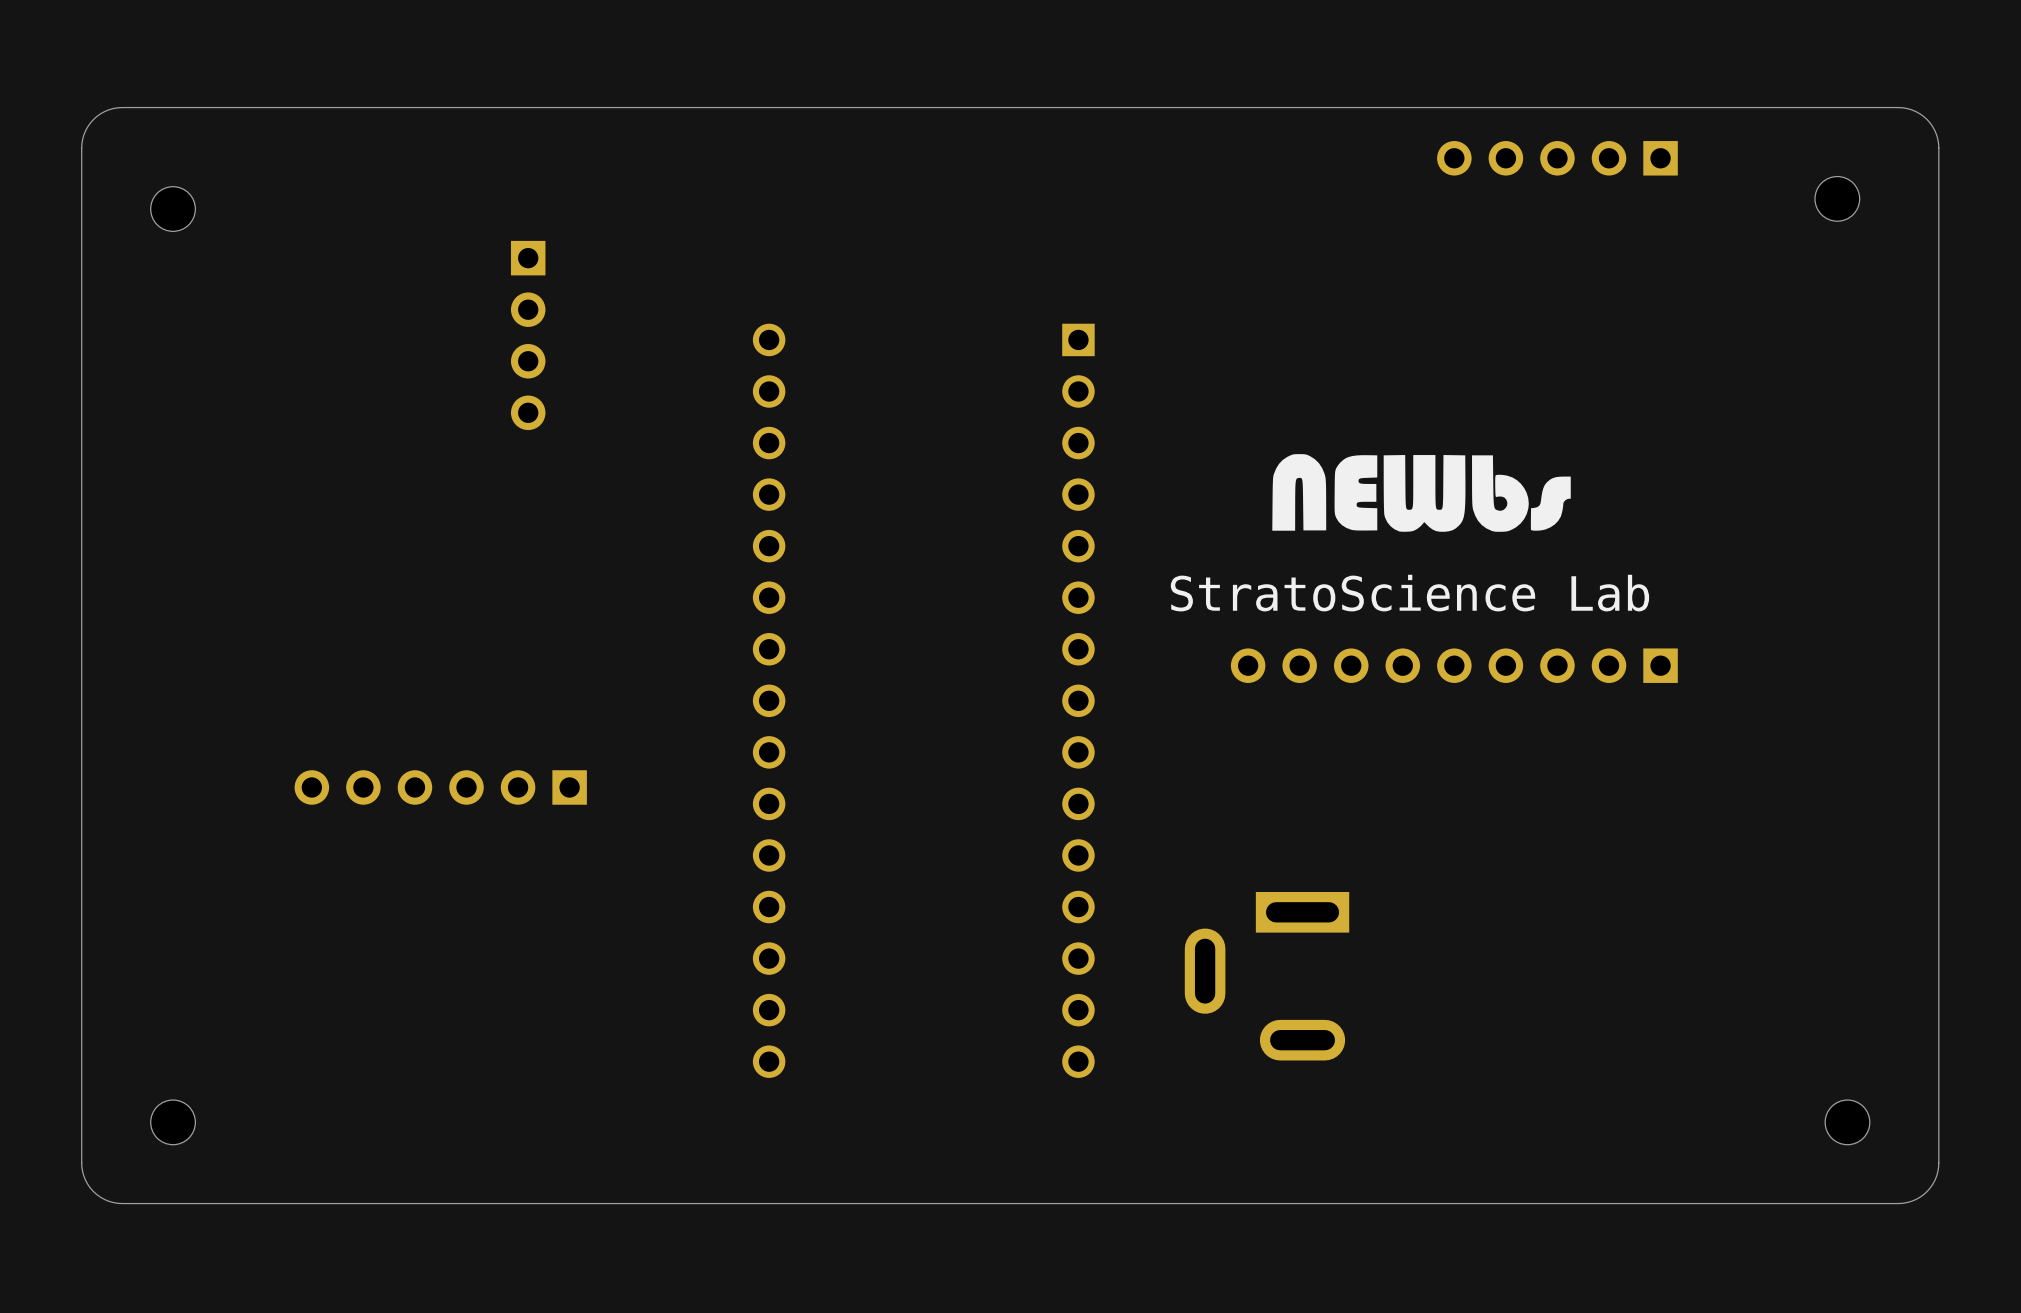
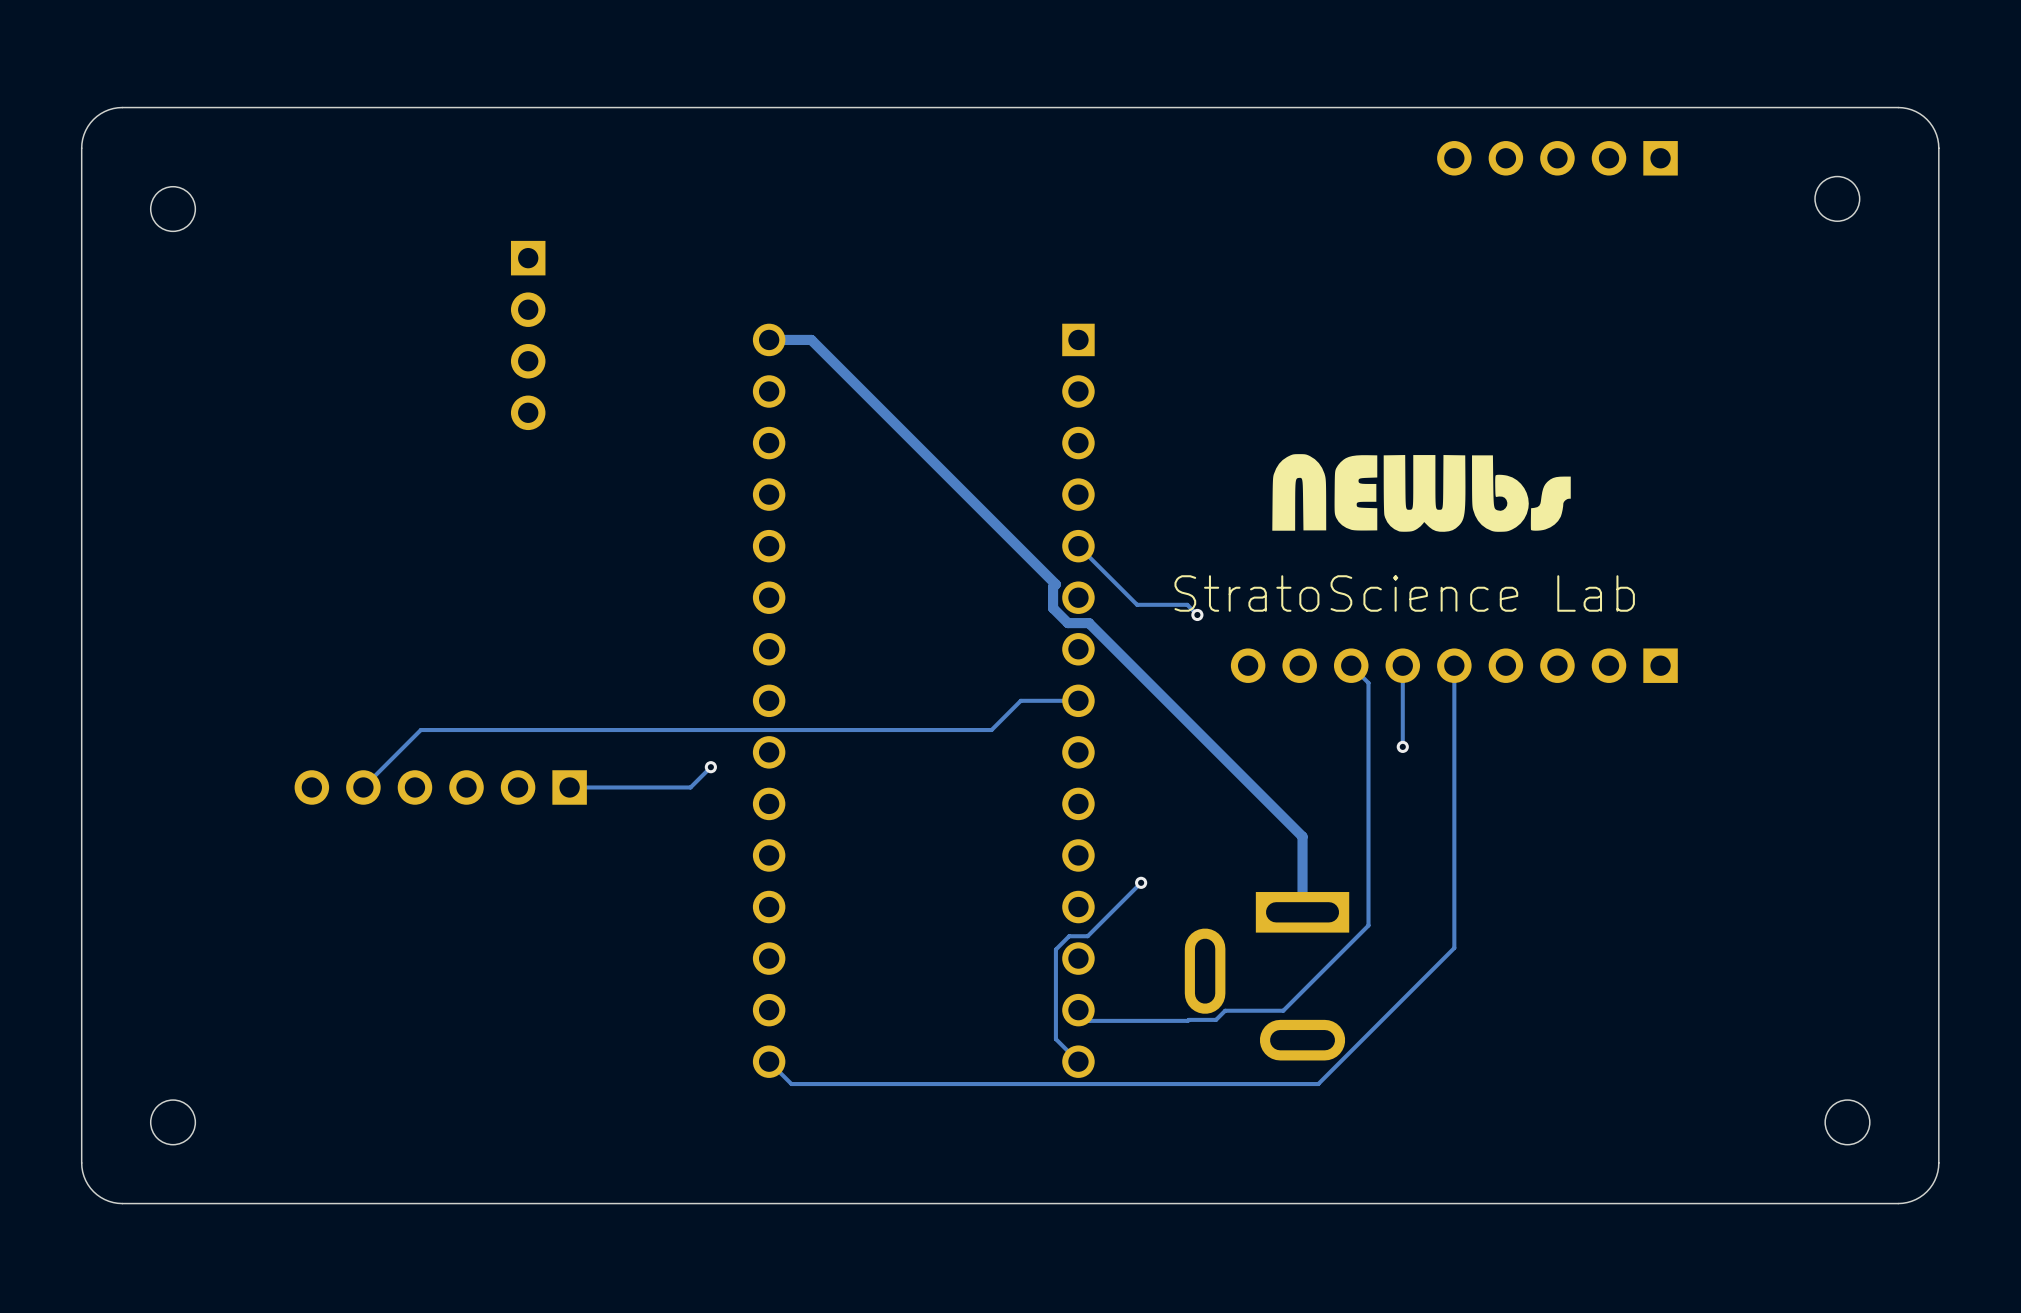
track: none -> (769, 339) (811, 339) (1055, 584) (1053, 587) (1053, 608) (1067, 623) (1088, 623) (1302, 836) (1302, 912) (1302, 902)
track: none -> (1078, 546) (1137, 604) (1187, 604) (1197, 614)
via: none -> (1197, 614)
track: none -> (1351, 665) (1368, 682) (1368, 925) (1283, 1010) (1225, 1010) (1216, 1019) (1089, 1020) (1078, 1010)
track: none -> (1402, 665) (1402, 746)
track: none -> (1454, 665) (1454, 948) (1318, 1084) (791, 1084) (769, 1061)
track: none -> (1078, 700) (1020, 700) (991, 730) (420, 730) (363, 787)
via: none -> (1402, 746)
track: none -> (710, 767) (690, 787) (569, 787)
via: none -> (710, 767)
track: none -> (1141, 882) (1087, 936) (1069, 936) (1055, 949) (1055, 1039) (1078, 1061)
via: none -> (1141, 882)

